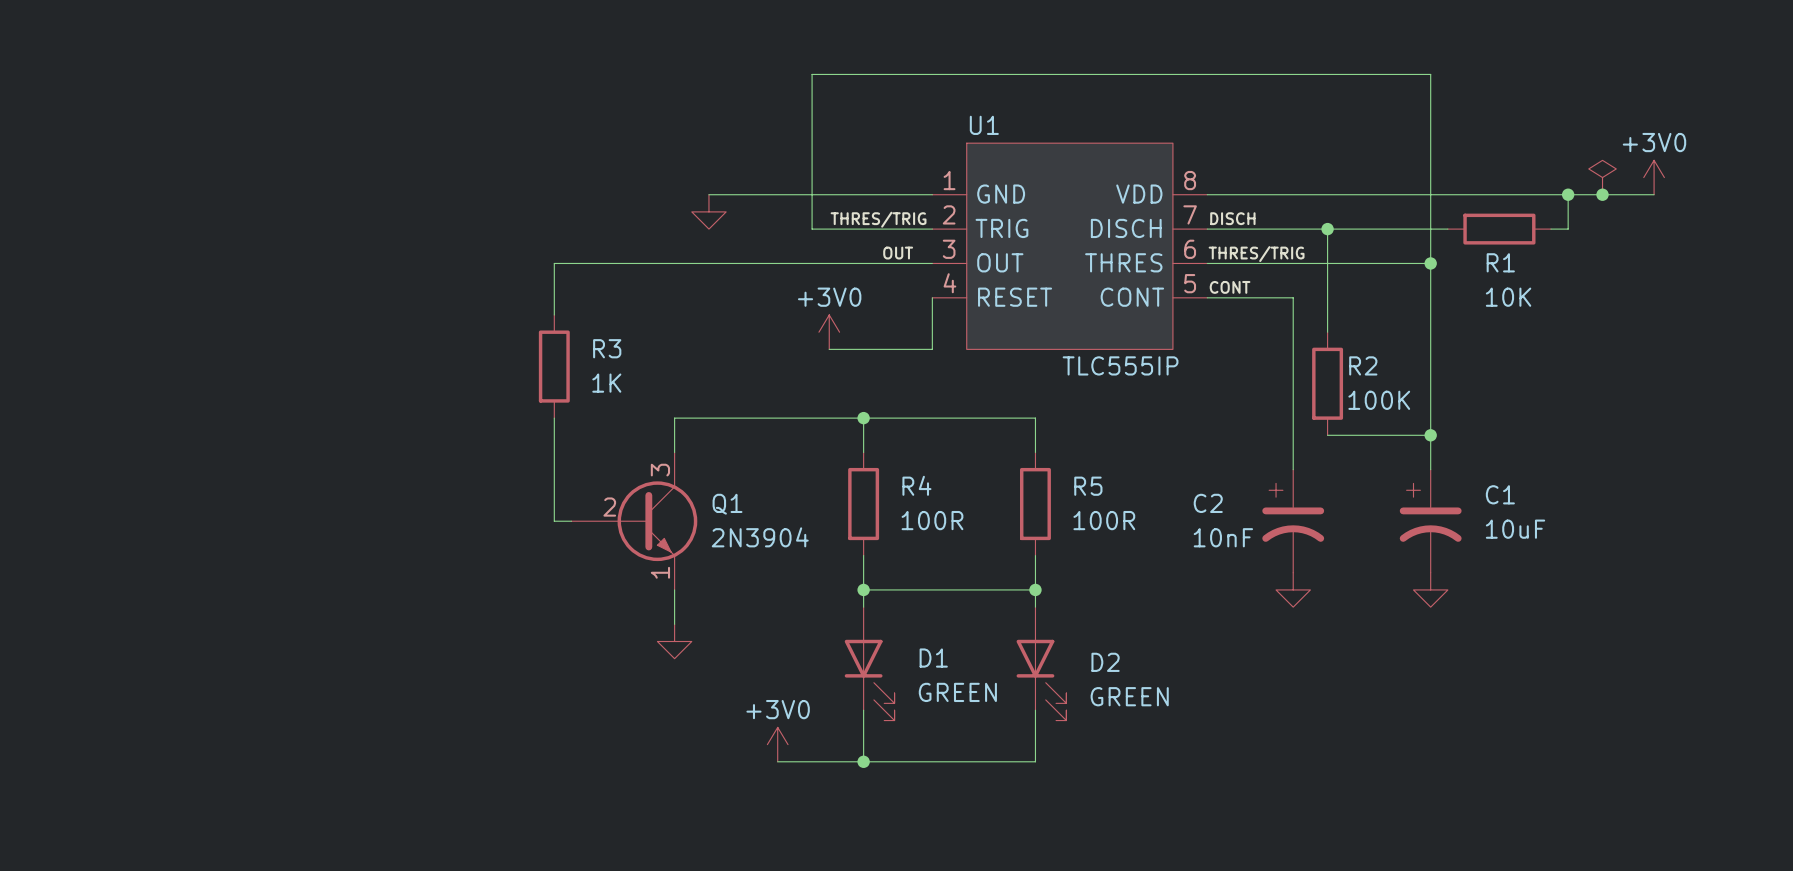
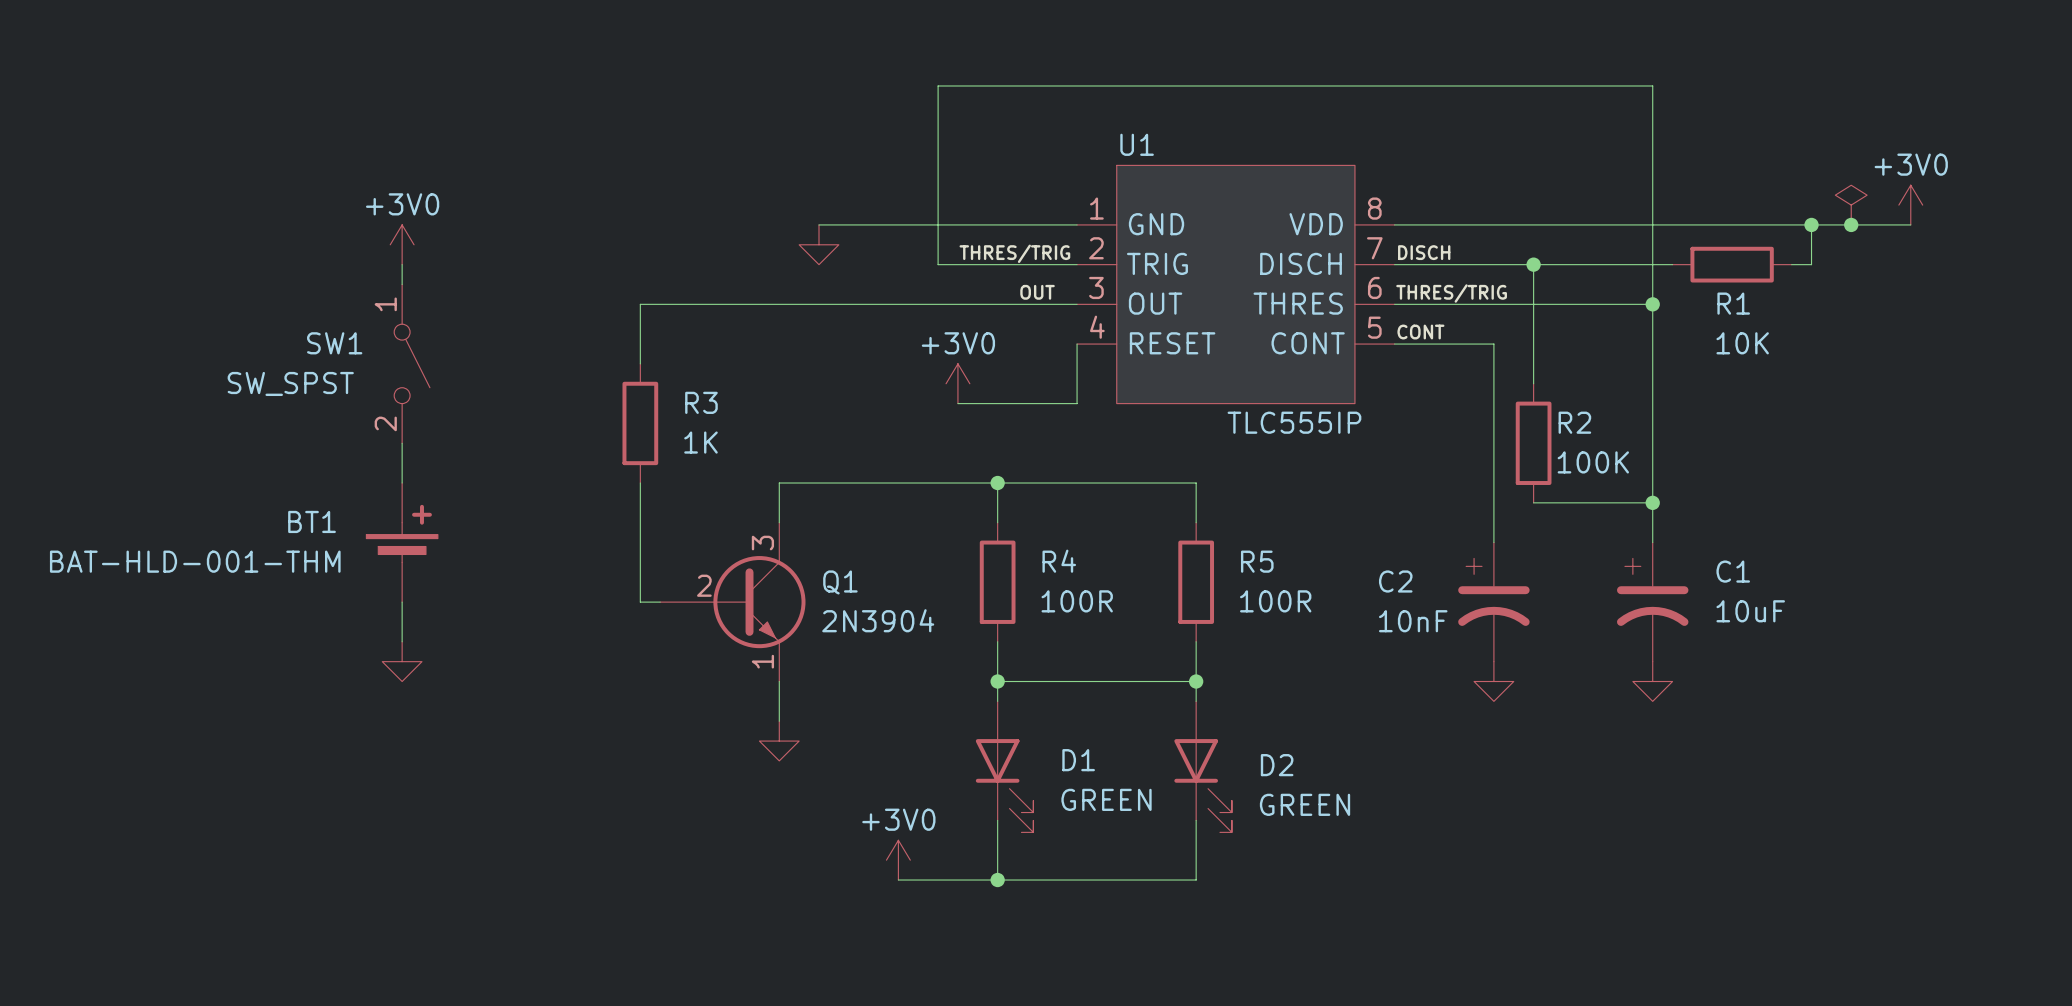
power symbol: none -> +3V0 (402, 244)
wire: none -> (402, 264) (402, 284)
SW1: none -> SW_SPST (412, 363)
wire: none -> (402, 443) (402, 483)
BT1: none -> BAT-HLD-001-THM (402, 542)
wire: none -> (402, 602) (402, 641)
power symbol: none -> (402, 661)

